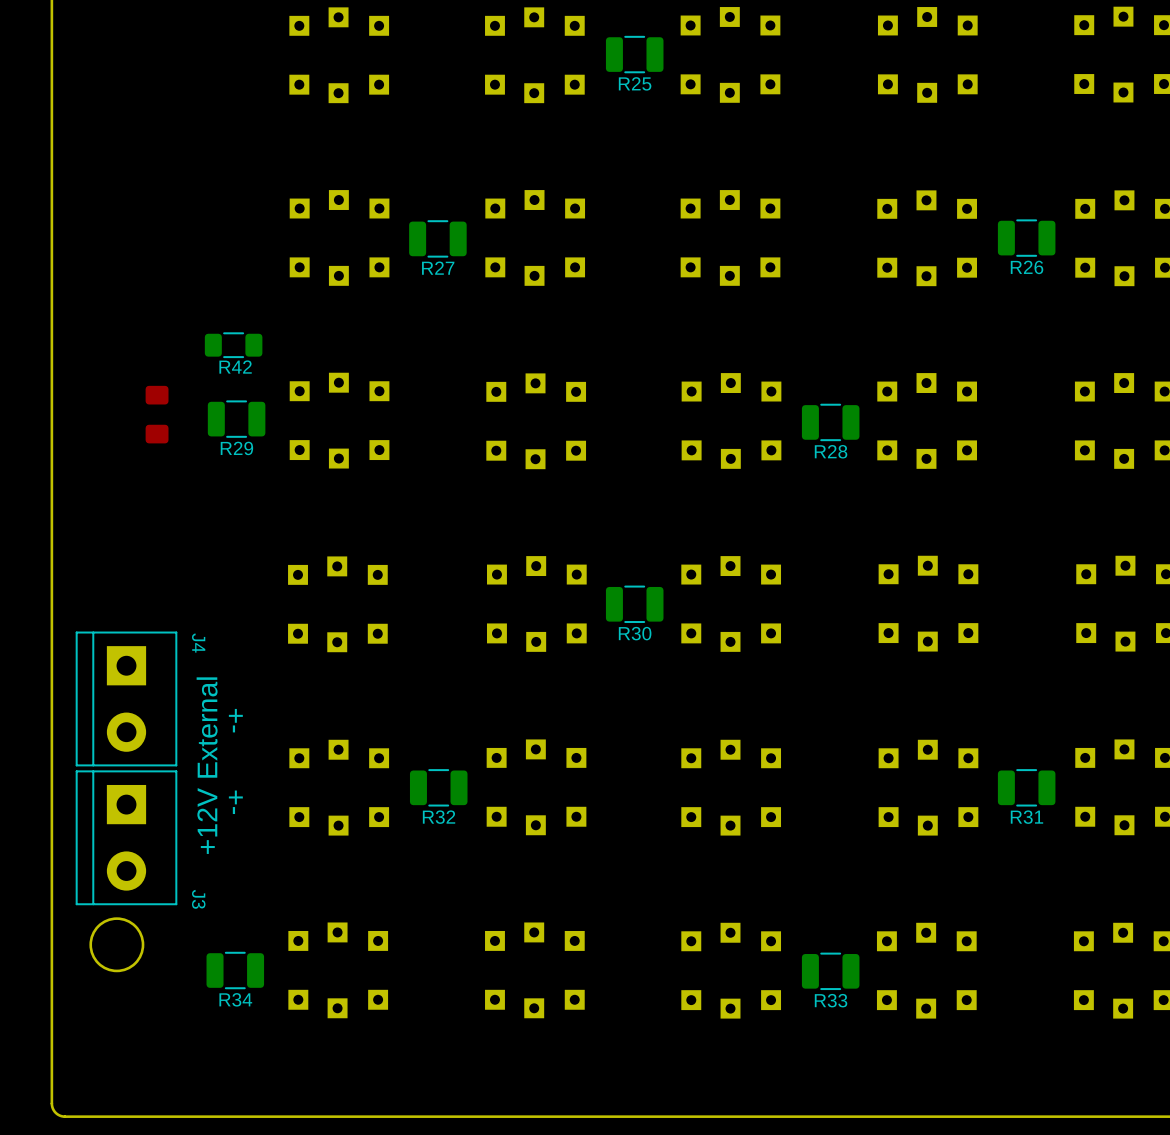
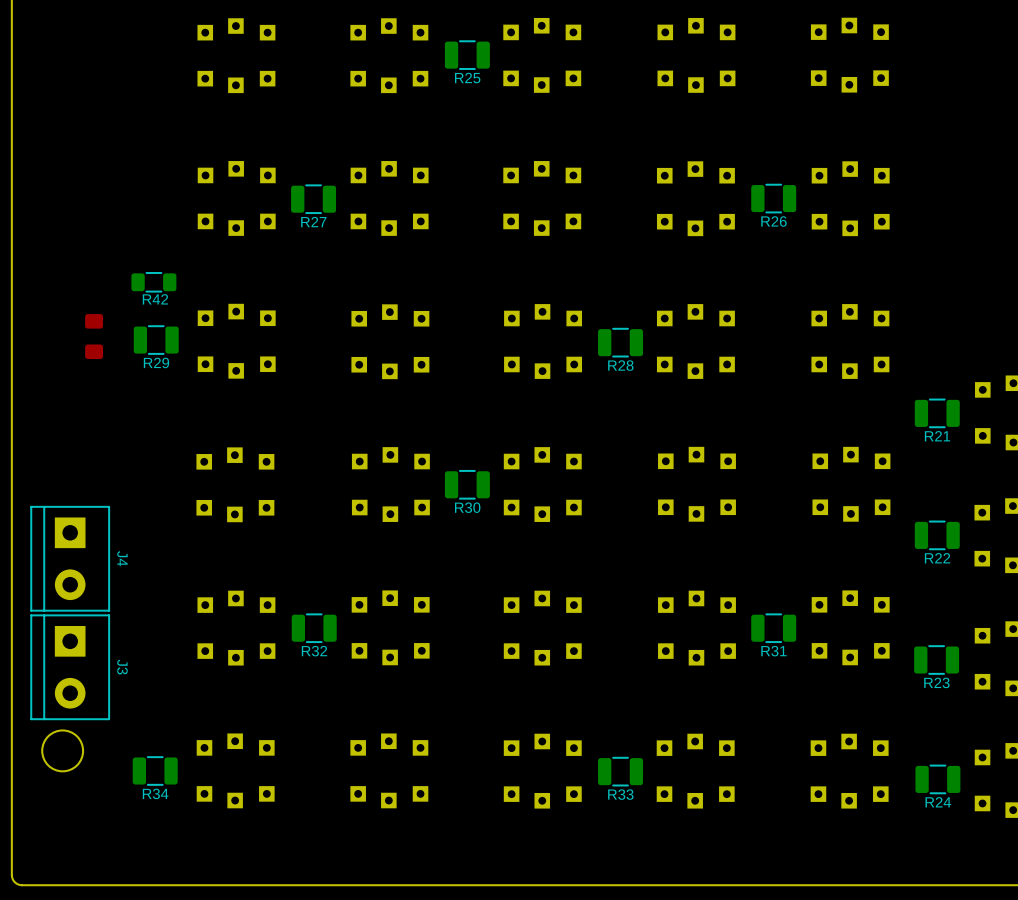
J4 name position: J4 (198, 643) -> J4 (122, 558)
text: +- +- (235, 761) -> none
text: +12V External (207, 765) -> none
J3 name position: J3 (198, 899) -> J3 (122, 667)

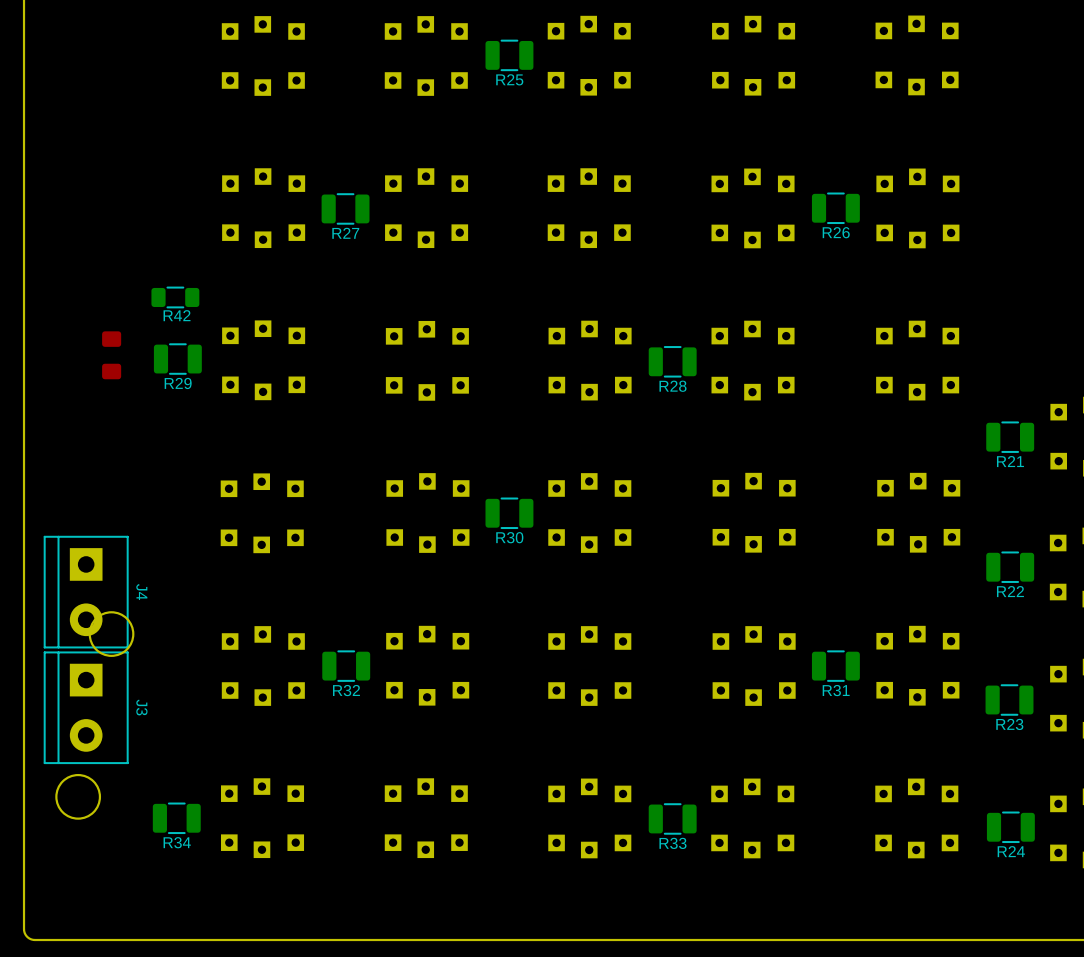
round board edge: none -> [88, 611, 135, 657]

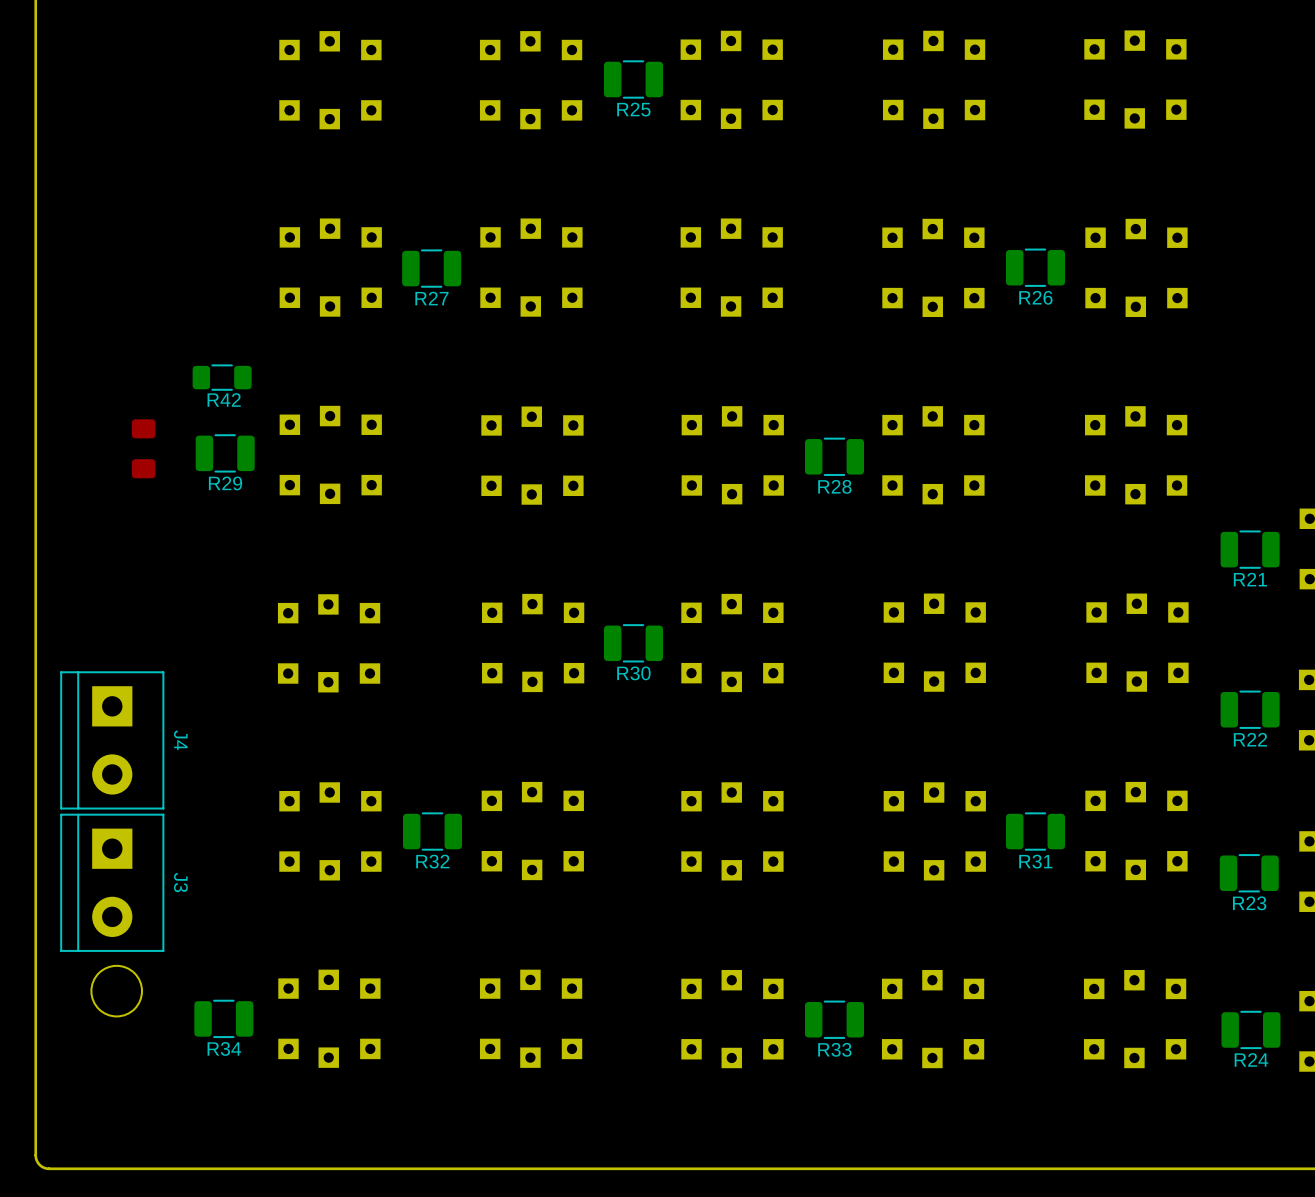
round board edge: [88, 611, 135, 657] -> none
round board edge: [55, 773, 102, 820] -> none
round board edge: none -> [91, 965, 143, 1017]

